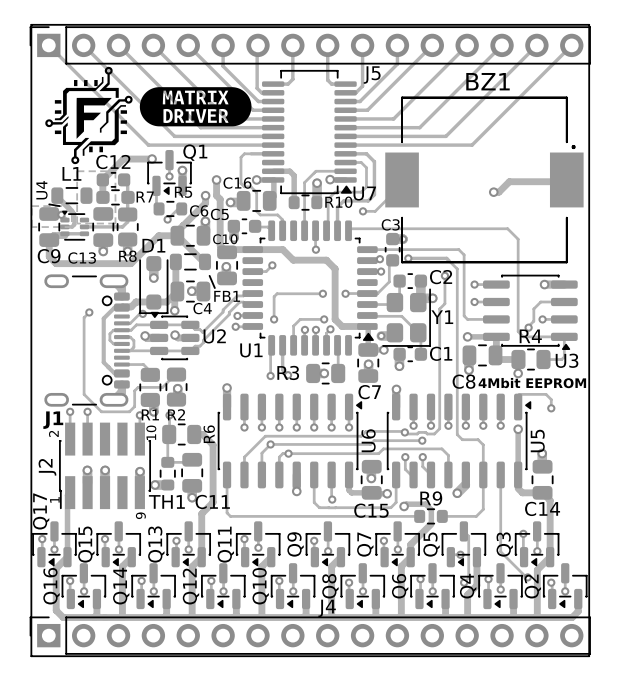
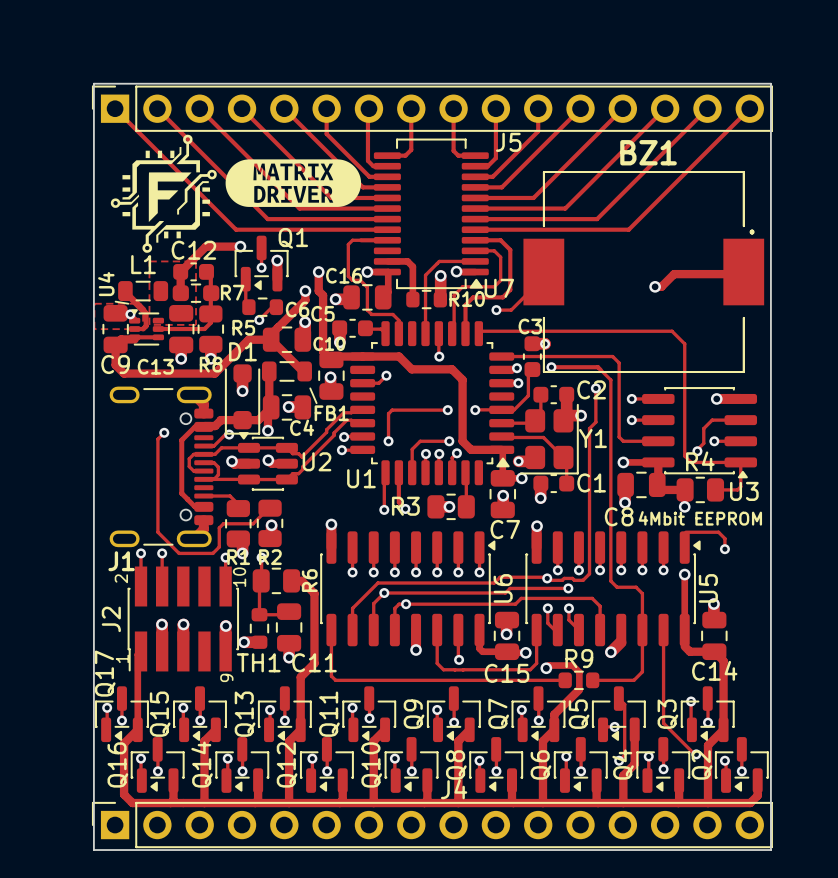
R5 name position: R5 (183, 192) -> R5 (243, 327)

